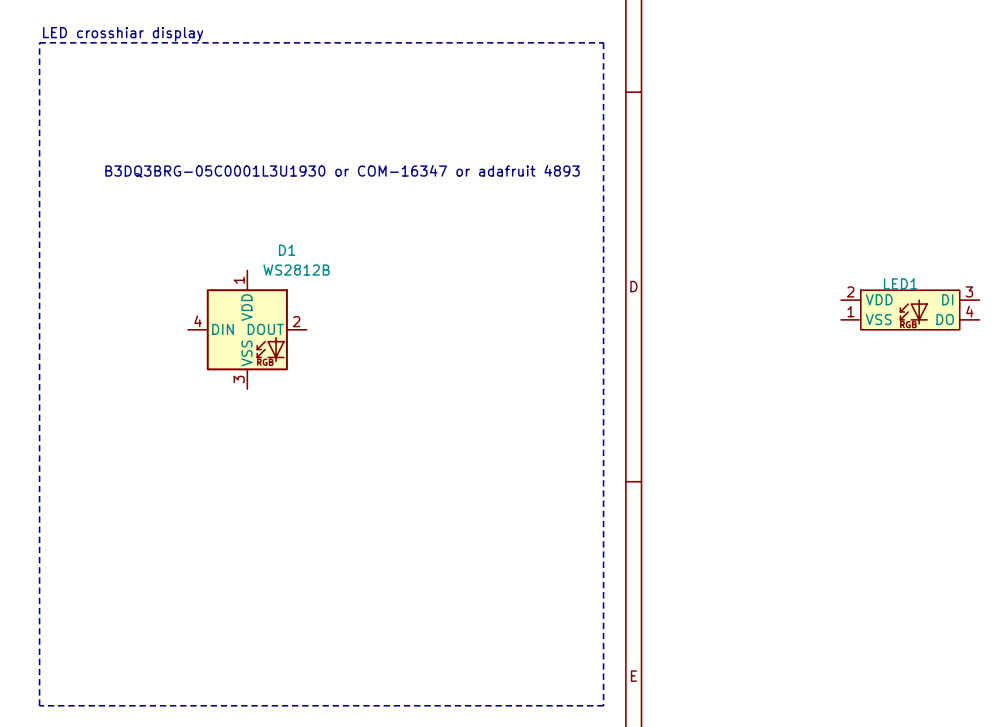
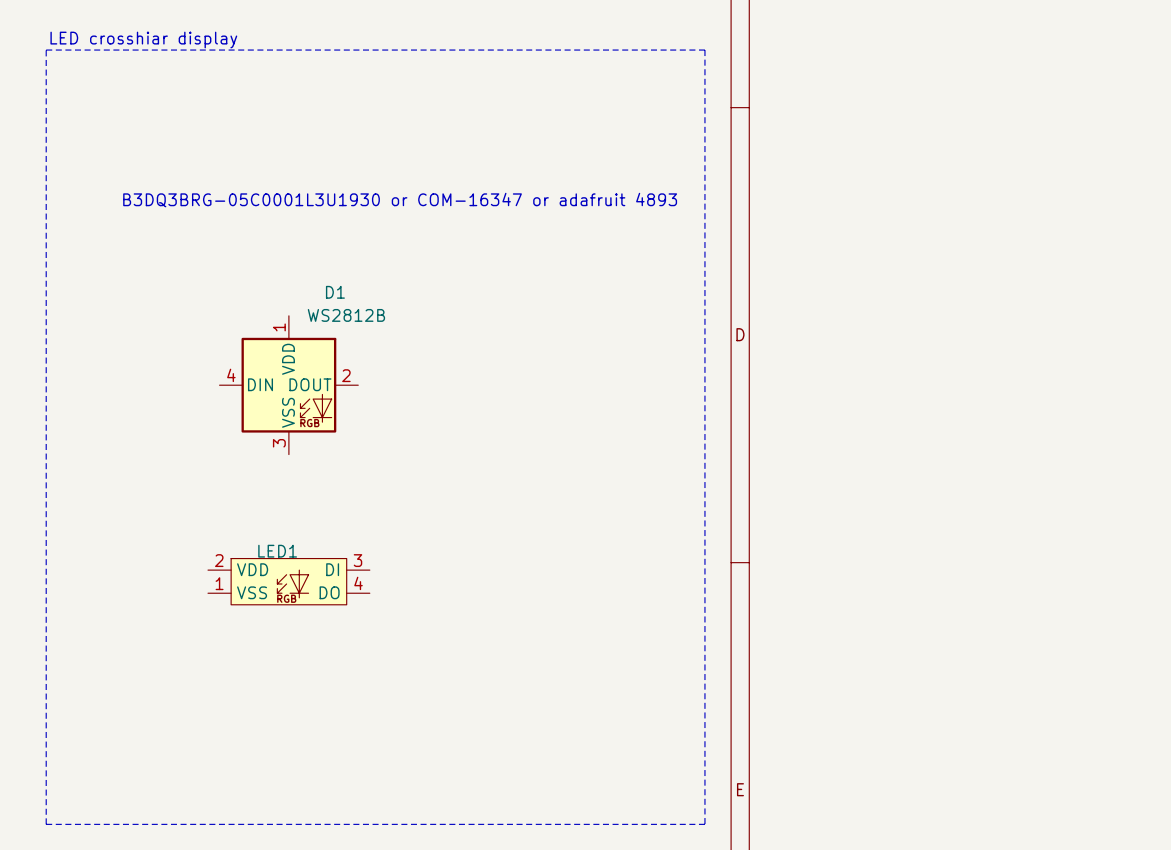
LED1 position: (910, 309) -> (288, 581)

